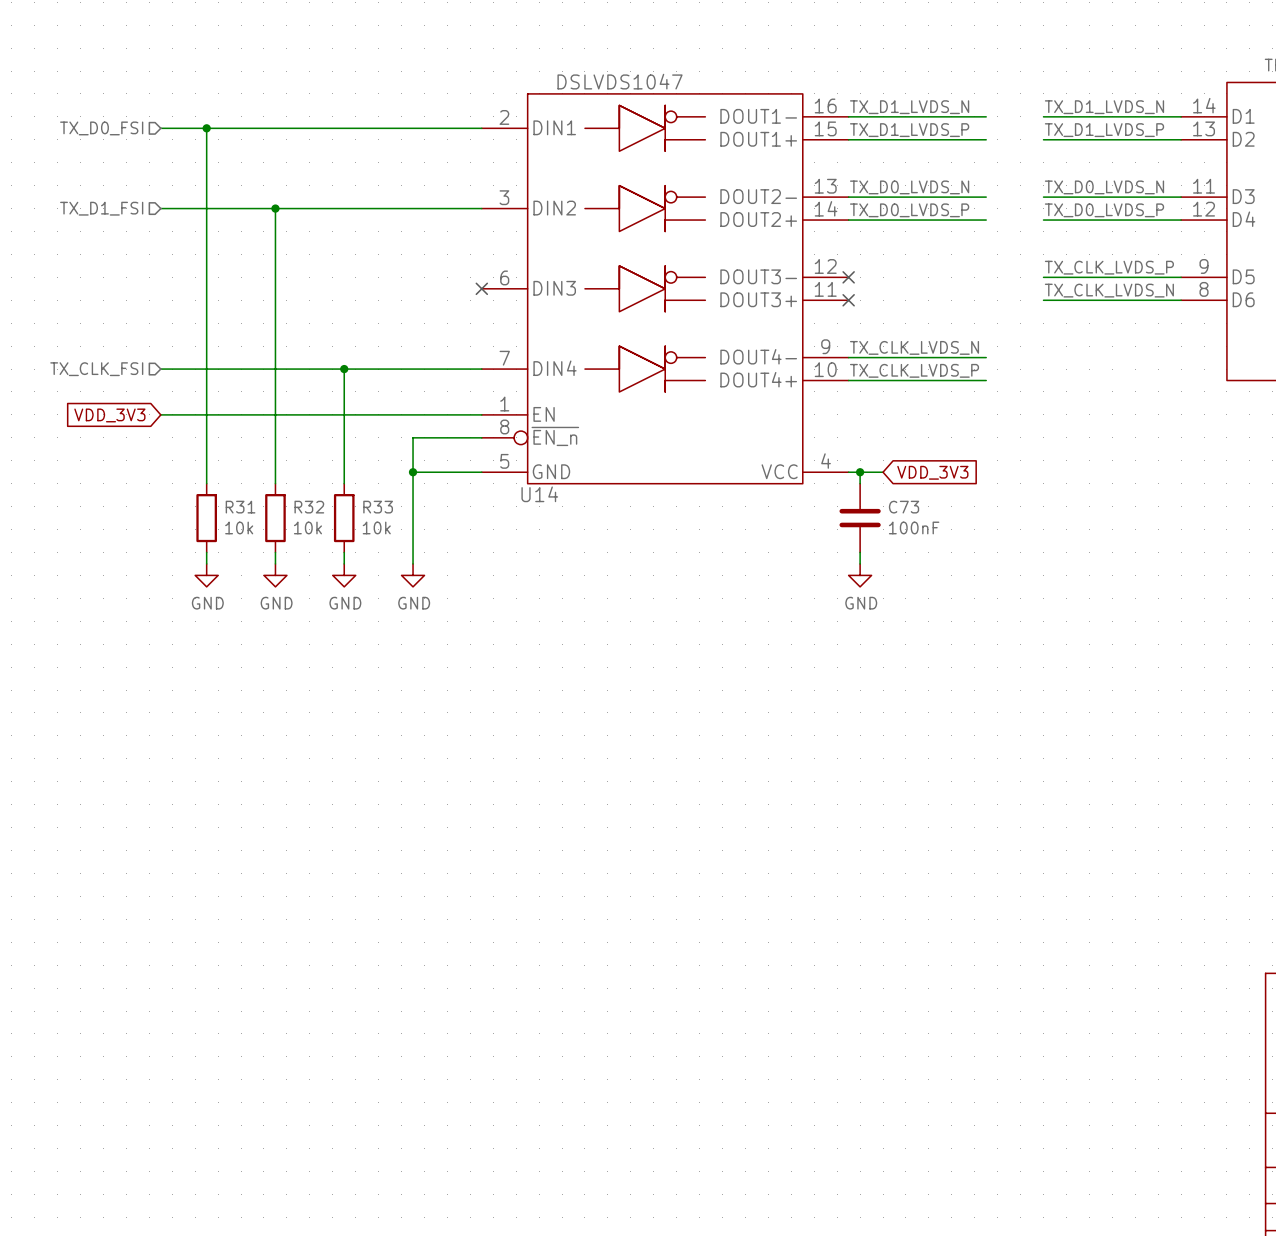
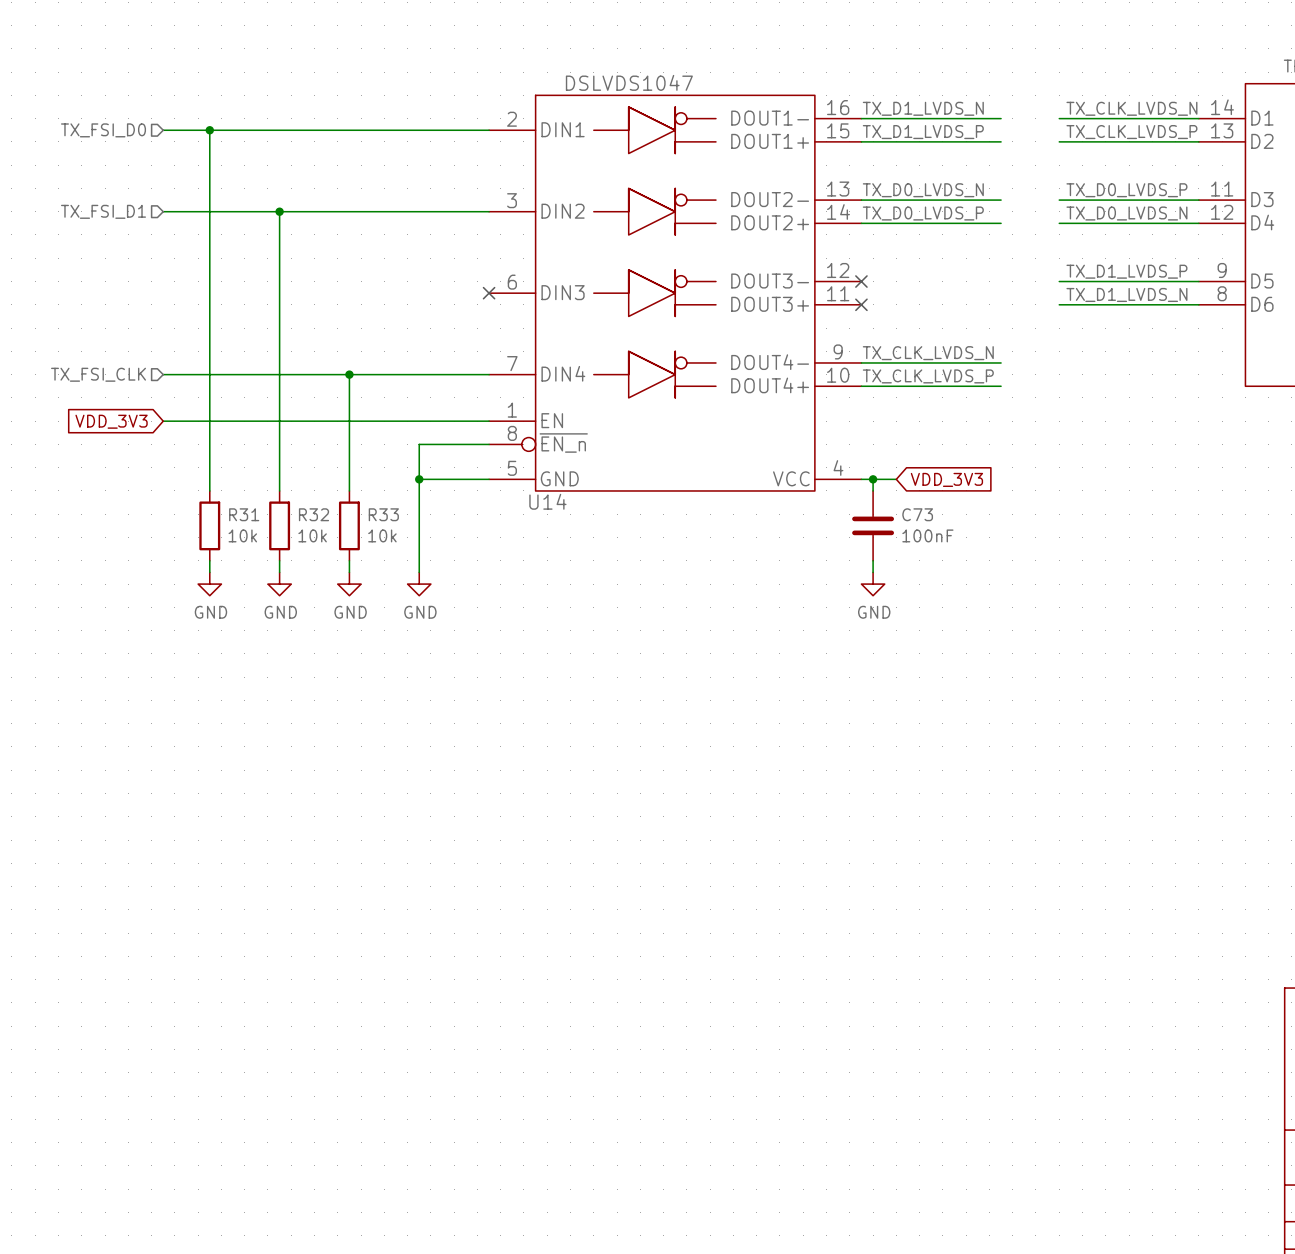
label: TX_D1_LVDS_N (1104, 107) -> TX_CLK_LVDS_N (1131, 108)
hierarchical label: TX_D0_FSI (101, 128) -> TX_FSI_D0 (103, 130)
label: TX_D1_LVDS_P (1104, 130) -> TX_CLK_LVDS_P (1131, 132)
label: TX_D0_LVDS_N (1104, 187) -> TX_D0_LVDS_P (1126, 190)
hierarchical label: TX_D1_FSI (101, 208) -> TX_FSI_D1 (103, 211)
label: TX_D0_LVDS_P (1104, 210) -> TX_D0_LVDS_N (1126, 213)
label: TX_CLK_LVDS_P (1109, 267) -> TX_D1_LVDS_P (1126, 271)
label: TX_CLK_LVDS_N (1109, 290) -> TX_D1_LVDS_N (1126, 294)
hierarchical label: TX_CLK_FSI (96, 369) -> TX_FSI_CLK (98, 374)

